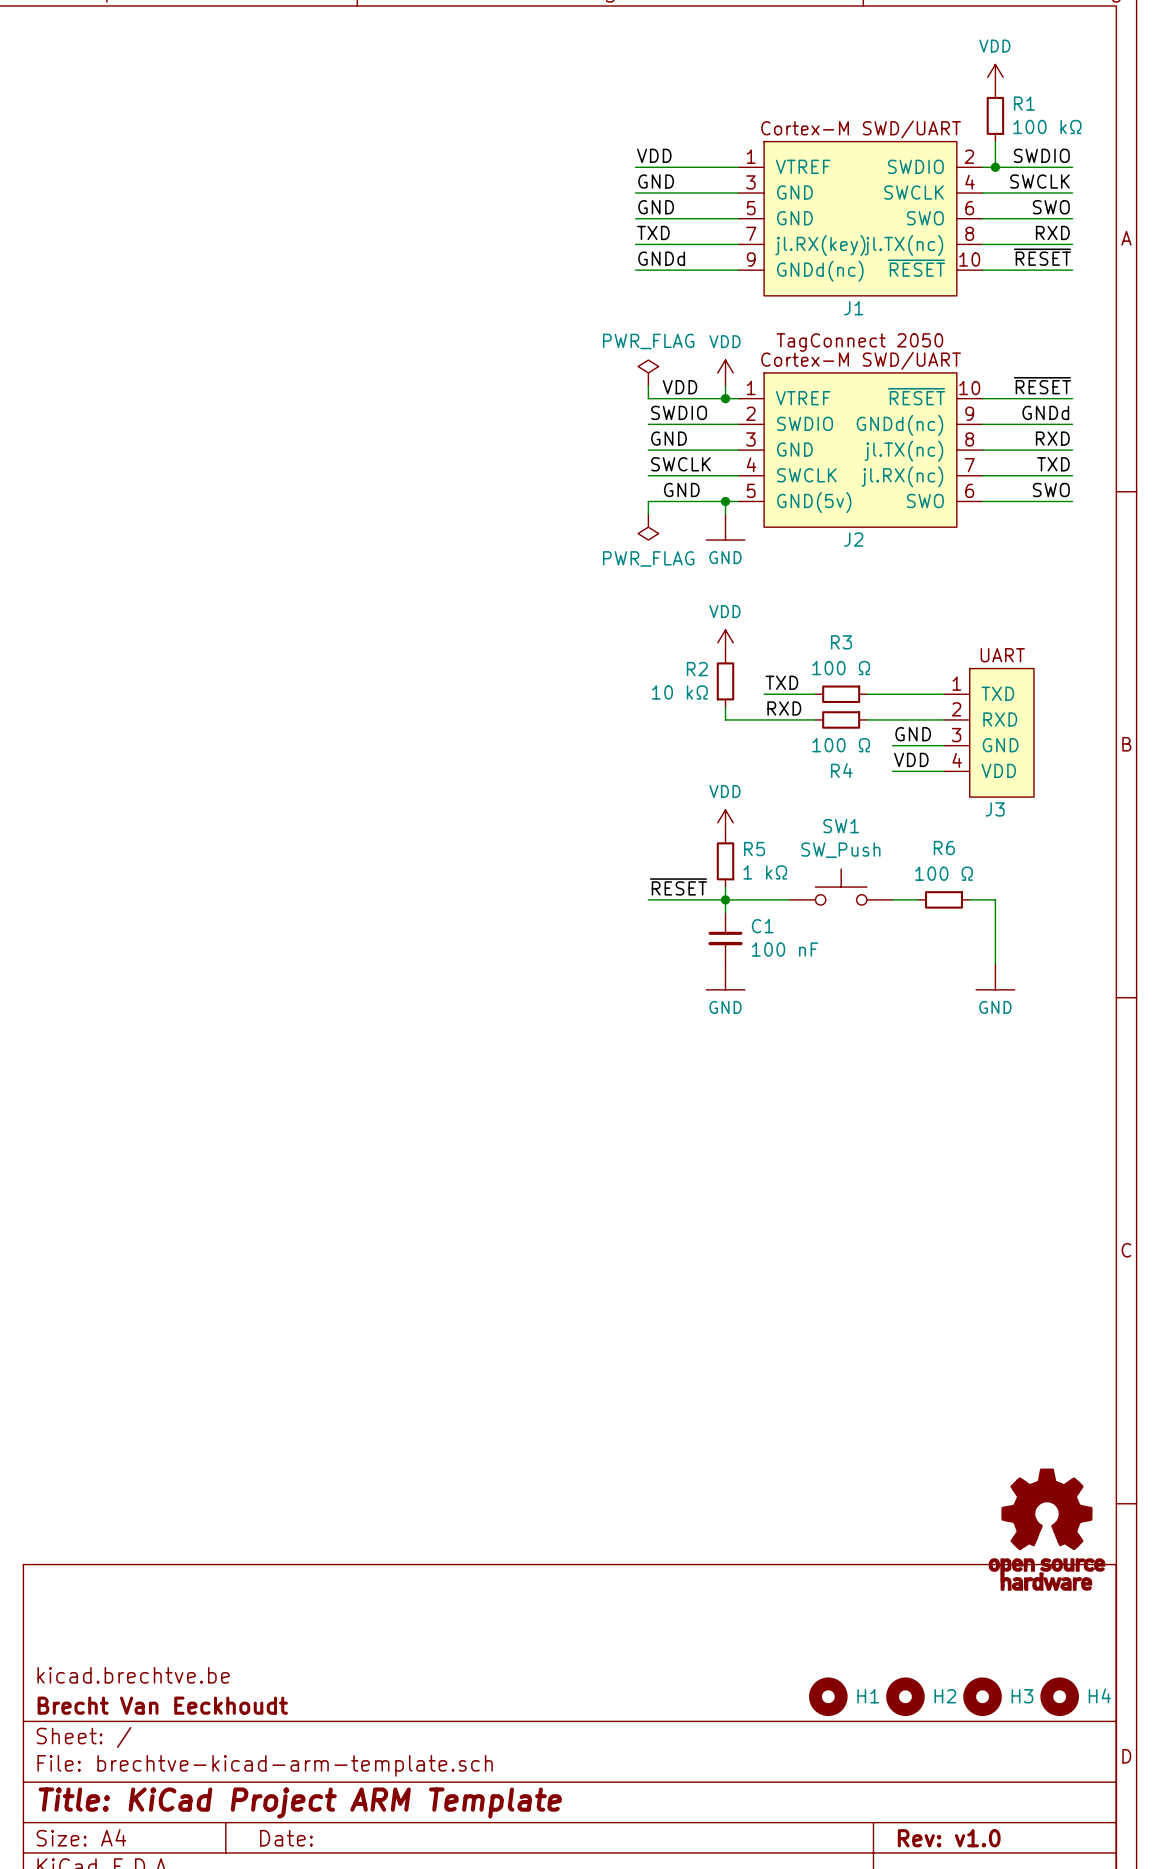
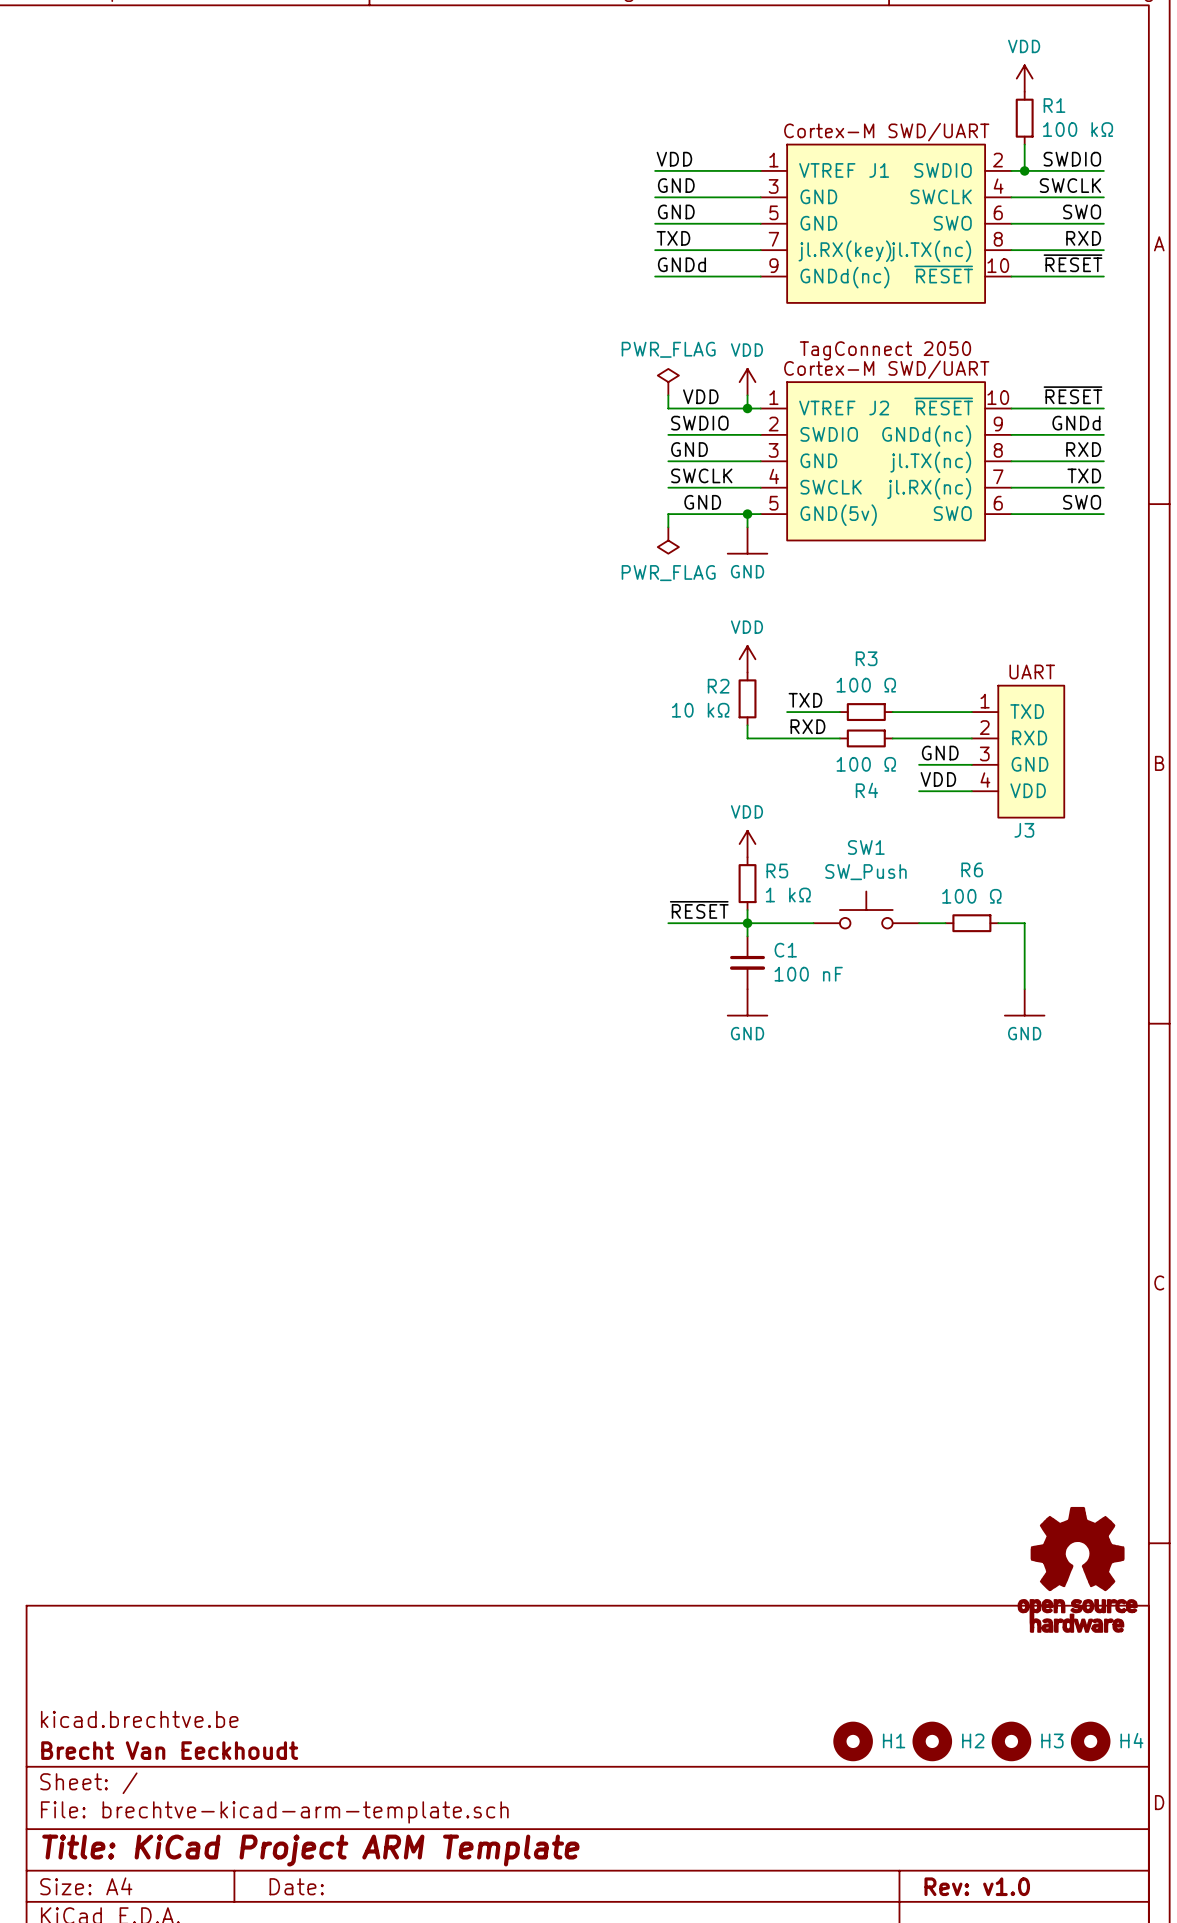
J1 name position: J1 (853, 308) -> J1 (879, 170)
J2 name position: J2 (853, 539) -> J2 (879, 408)

